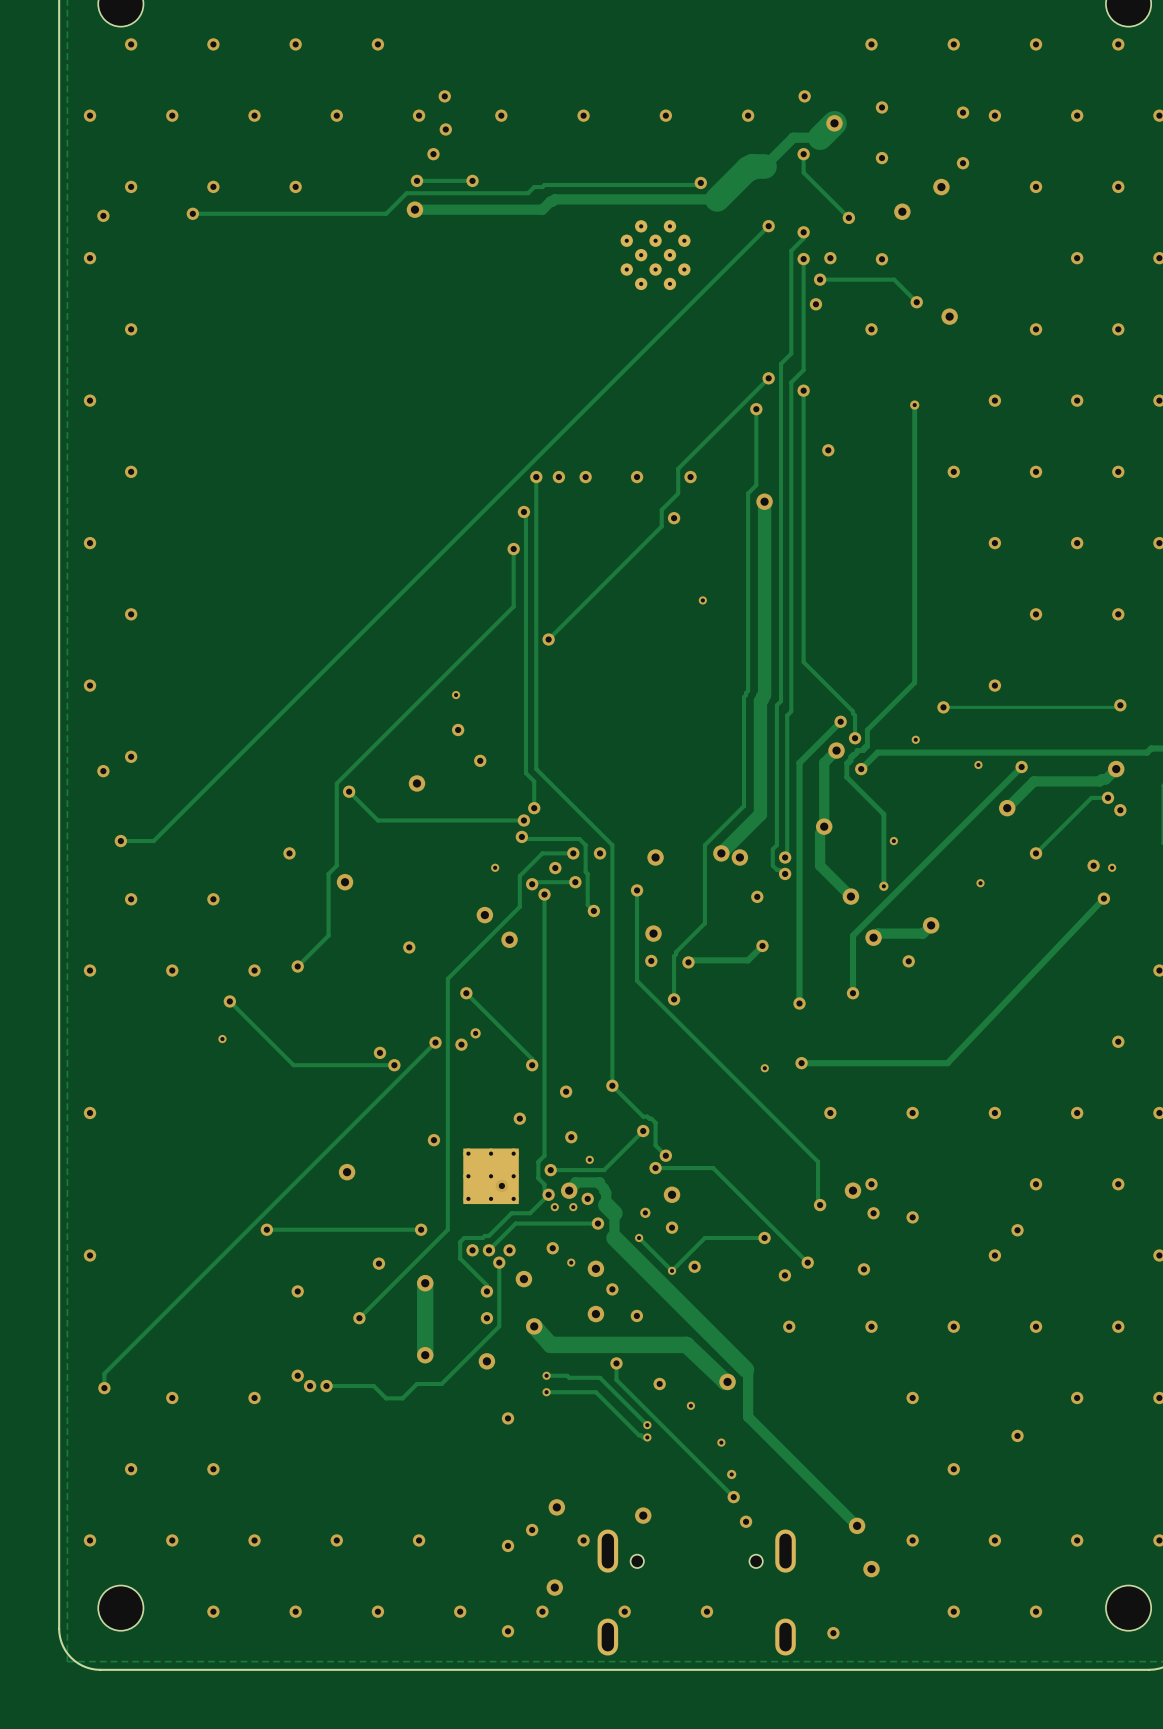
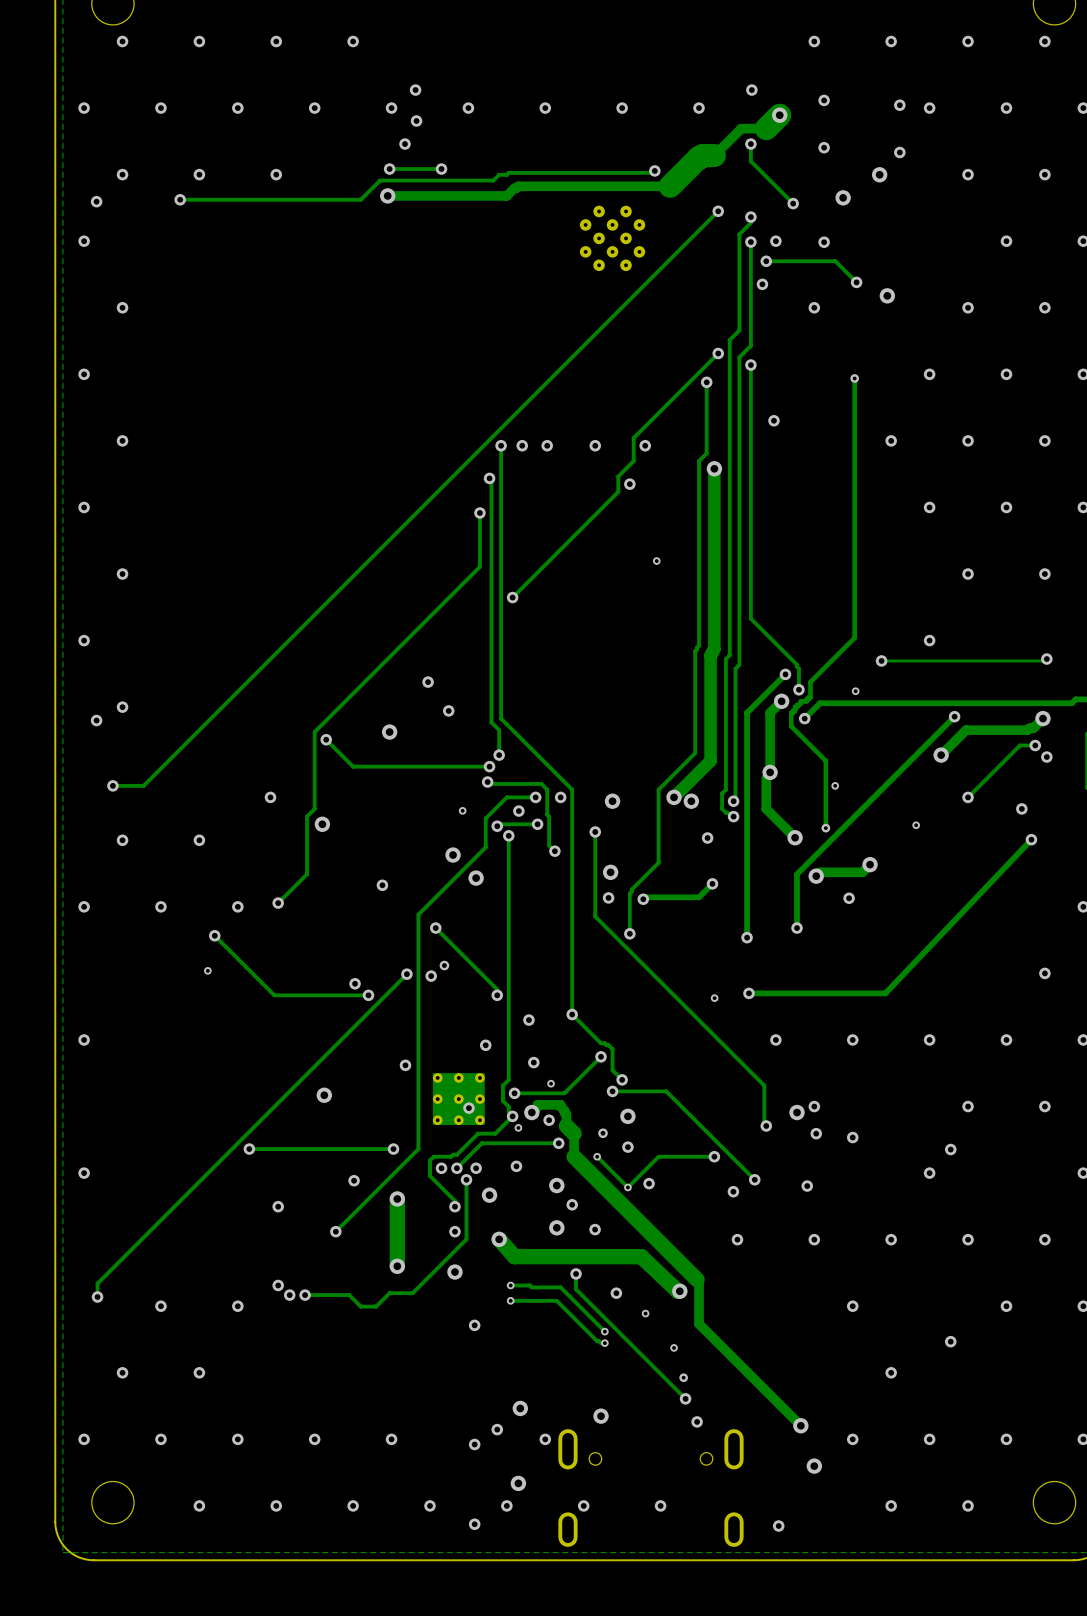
via: (456, 695) -> none
via: (978, 764) -> none
via: (1112, 867) -> none
via: (573, 1207) -> none
via: (571, 1262) -> none

